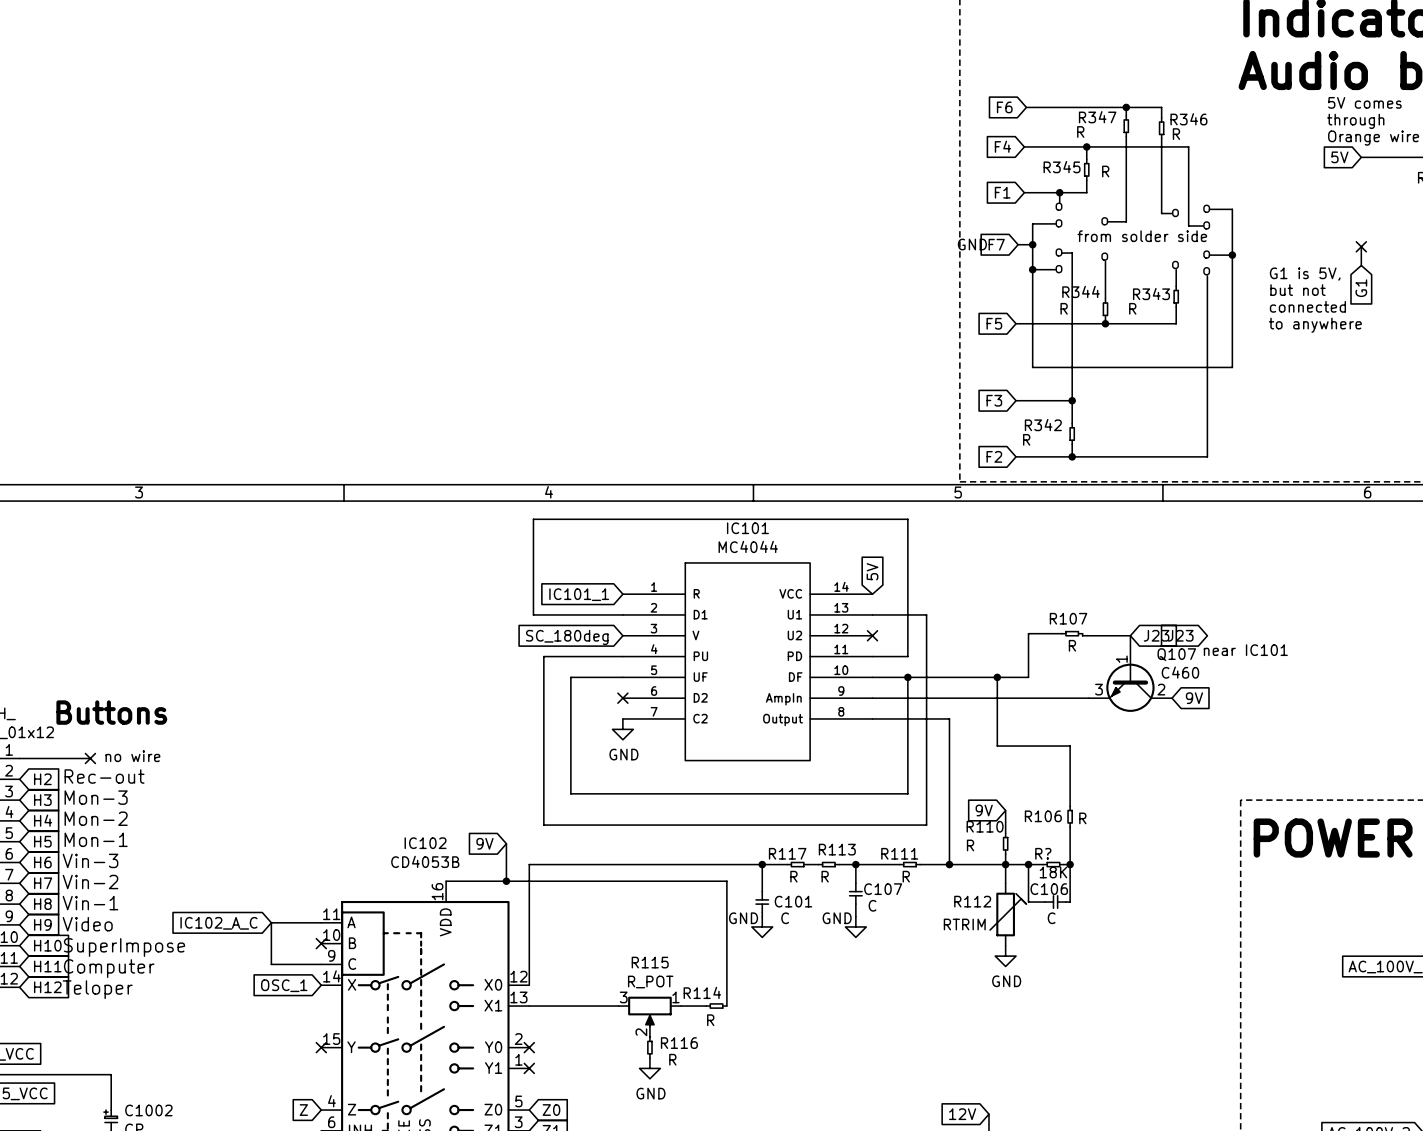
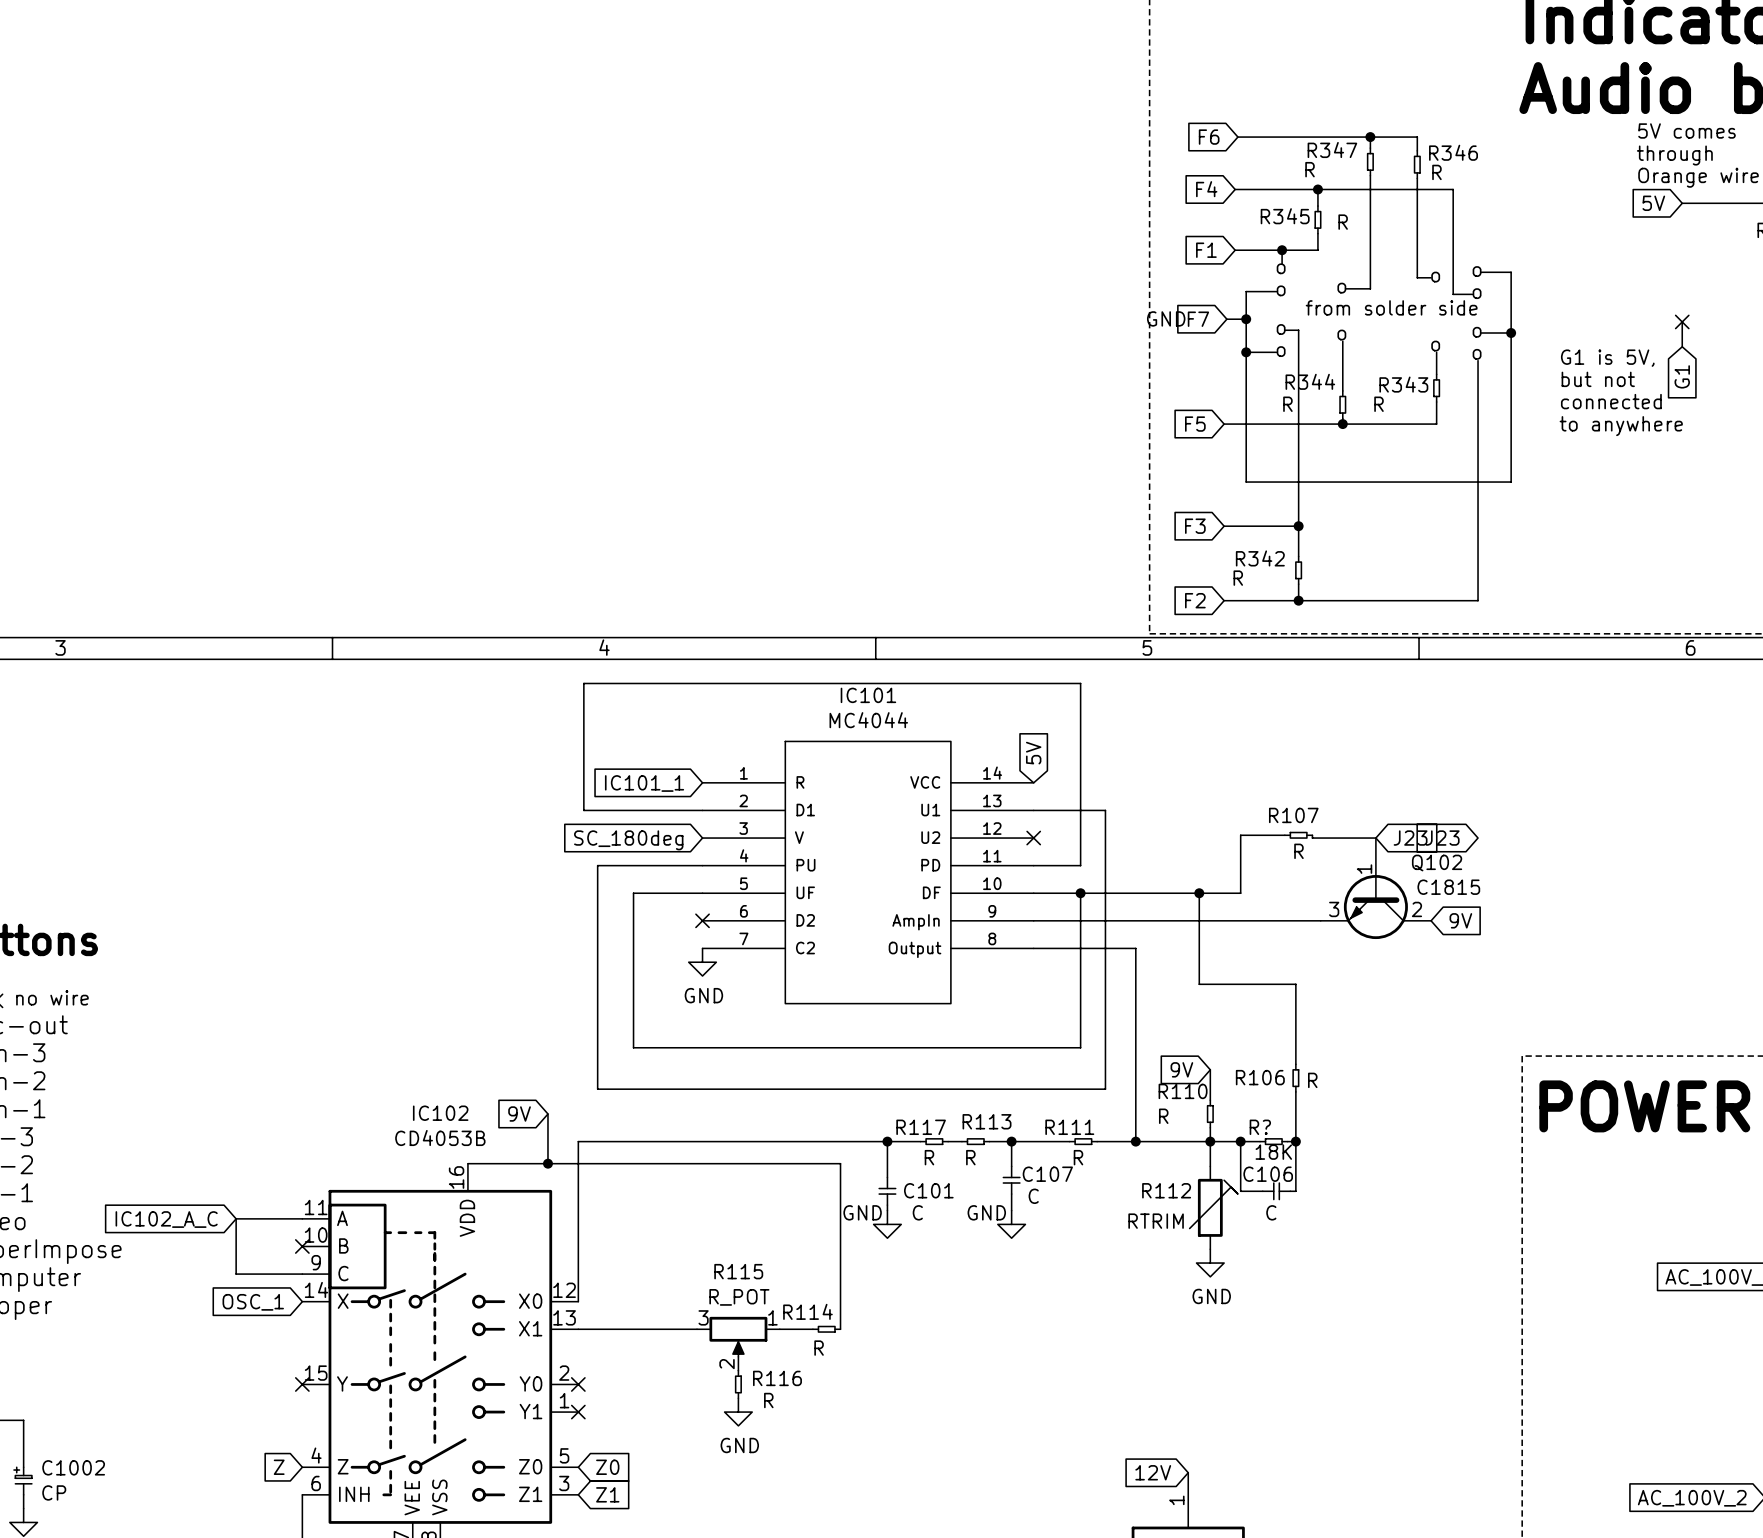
text: near IC101 (1245, 650) -> none
Q107 name: Q107 (1176, 654) -> Q102 (1437, 863)
Q107 value: C460 (1180, 672) -> C1815 (1448, 887)

